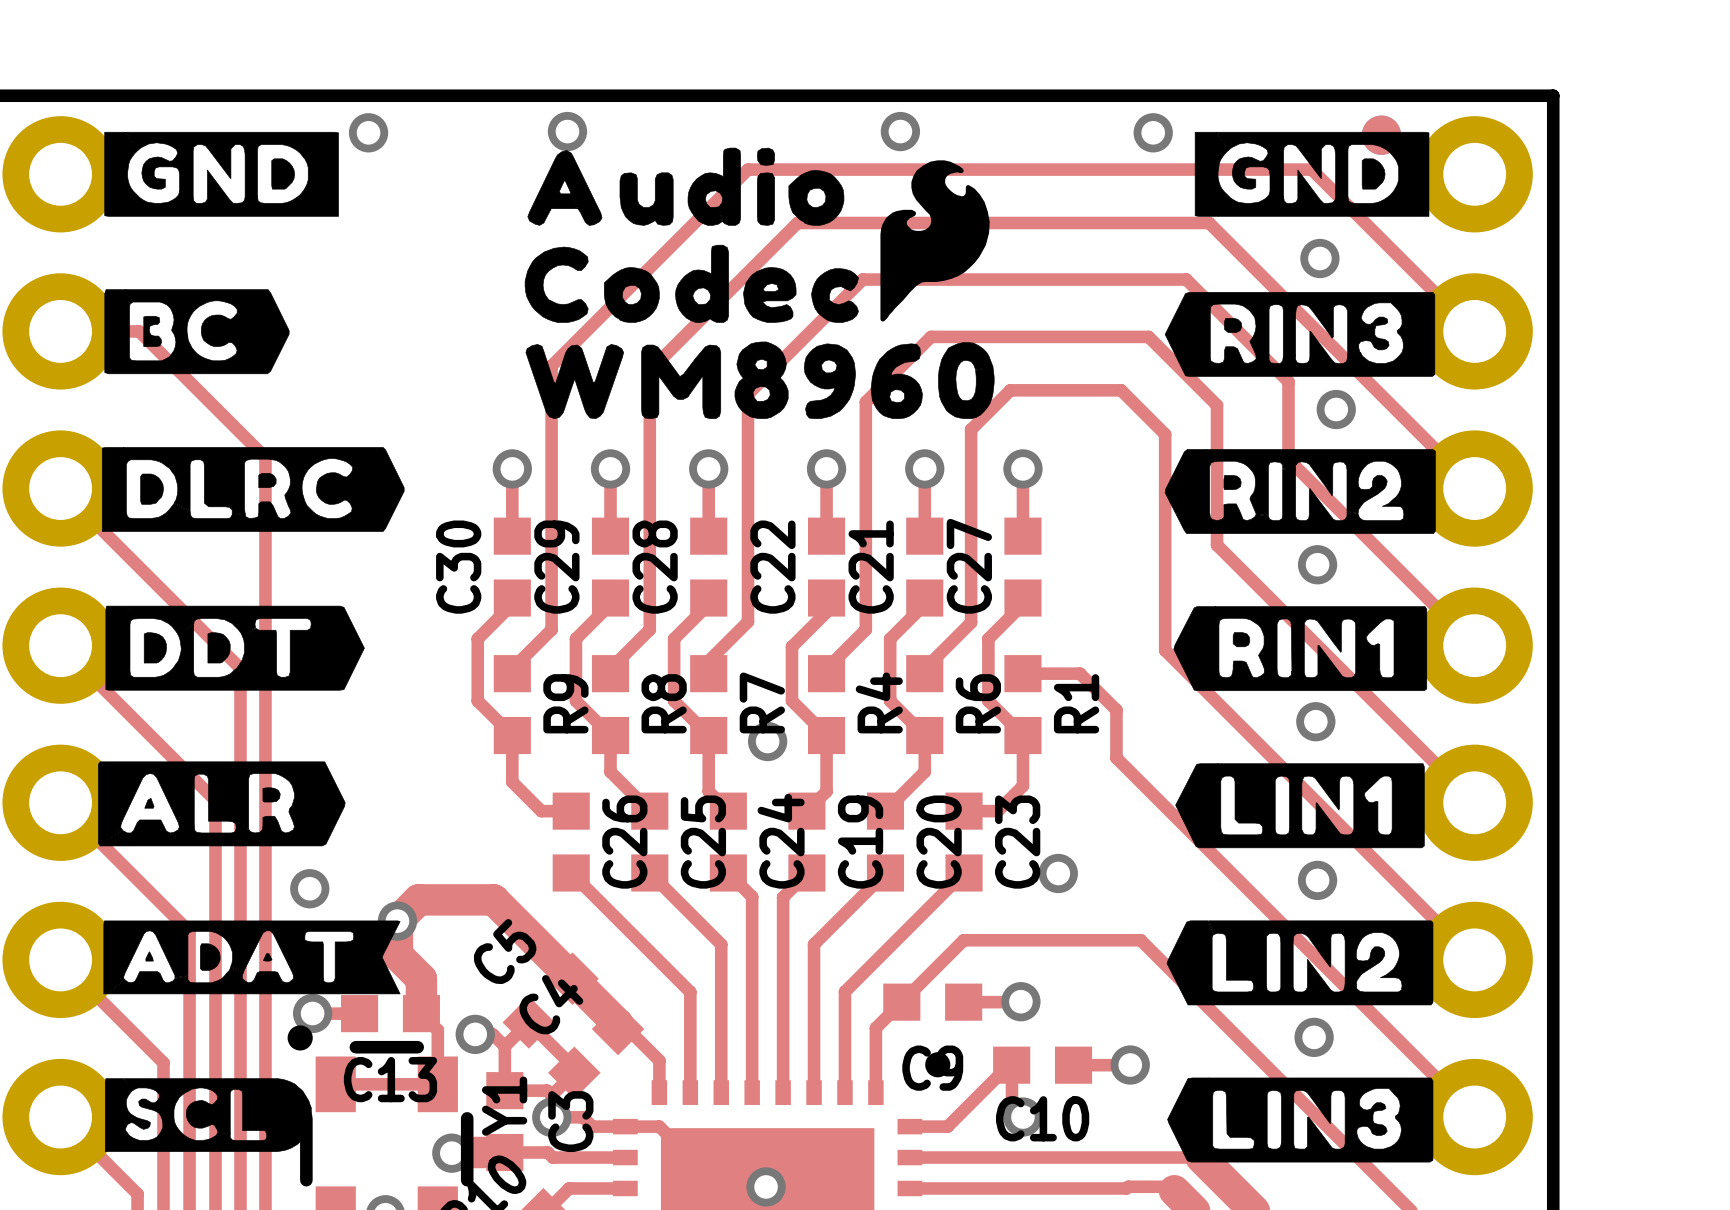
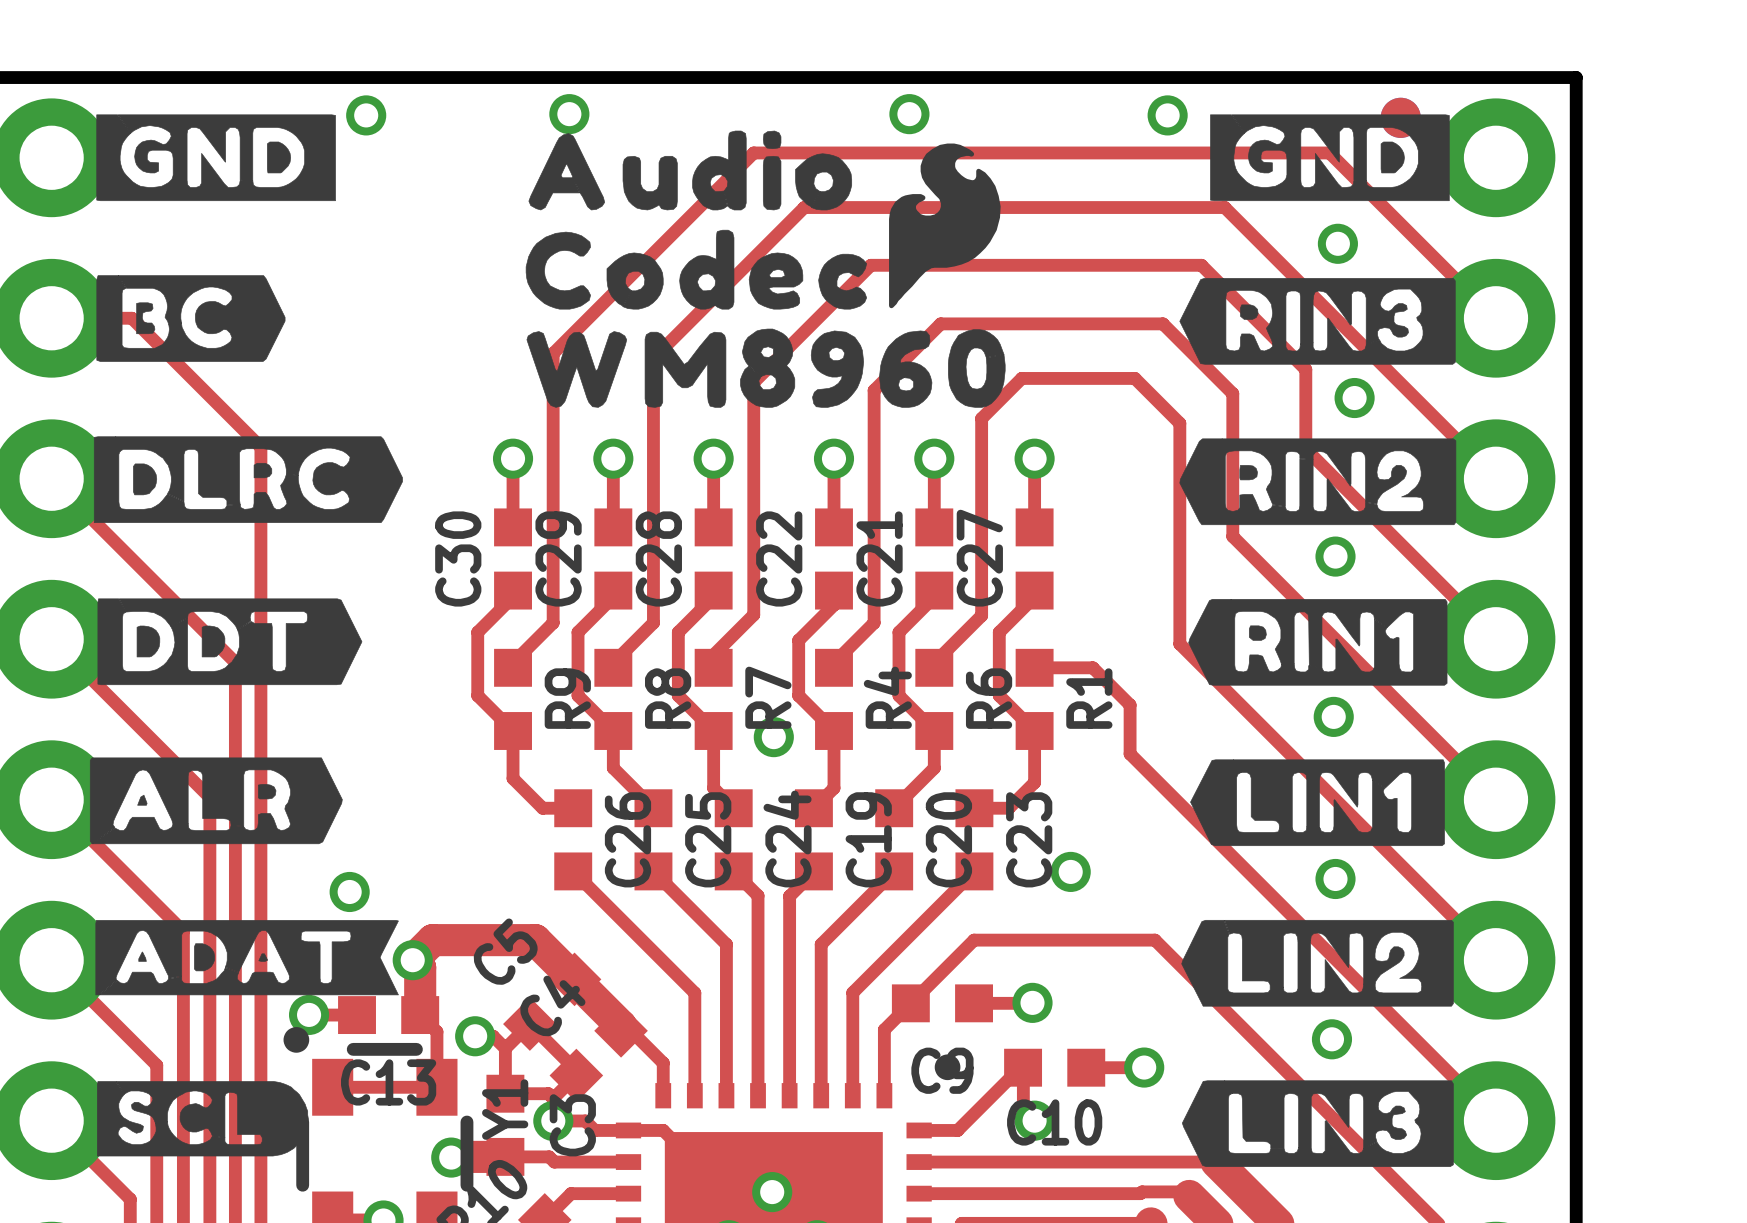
via: (309, 888) -> none
via: none -> (349, 891)
via position: (397, 921) -> (412, 960)
top track: (534, 940) (493, 899) (418, 899) (397, 921) (397, 955) (421, 979) -> (535, 940) (432, 940) (412, 960) (420, 967) (420, 979)

